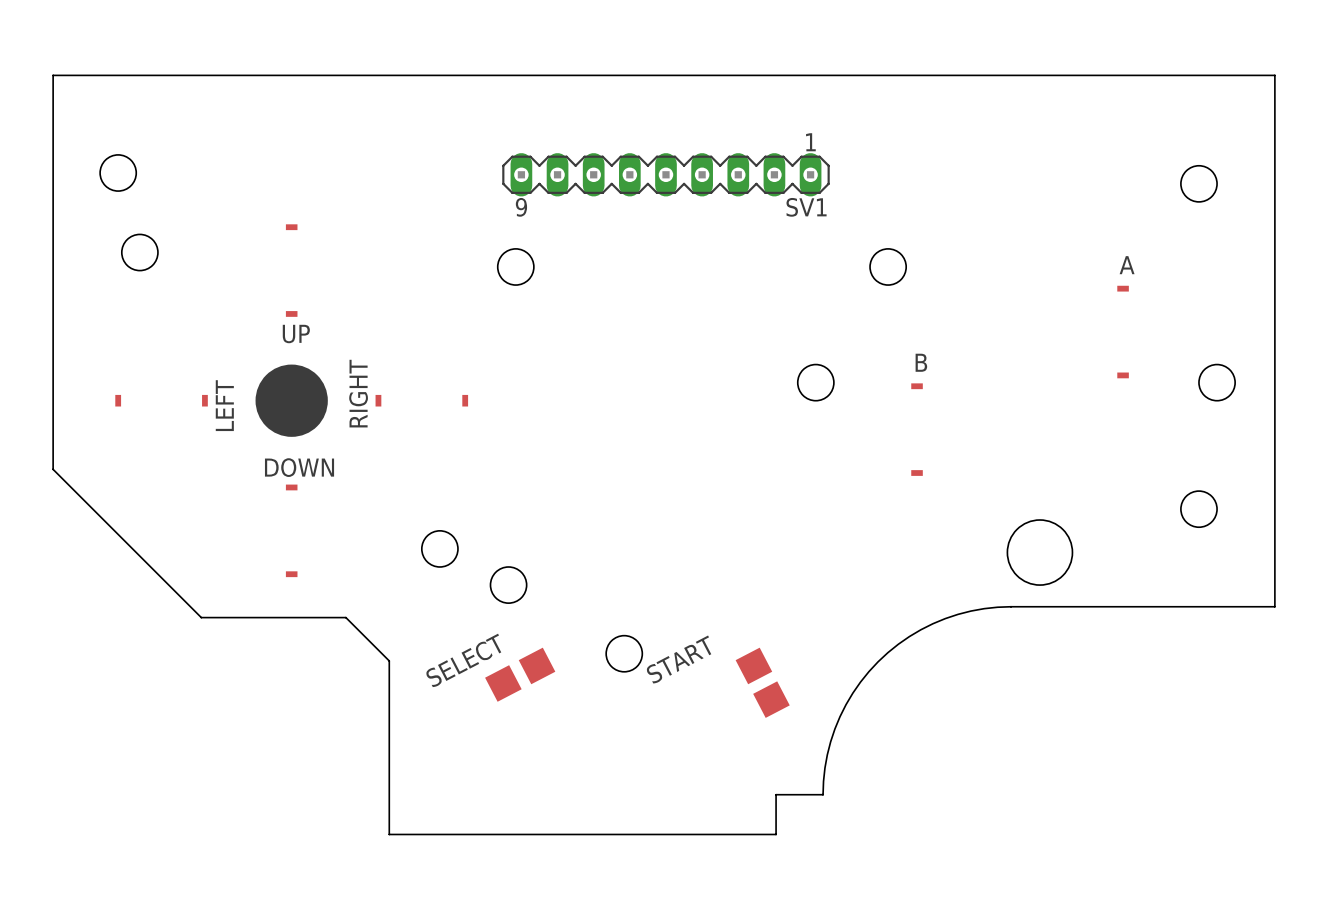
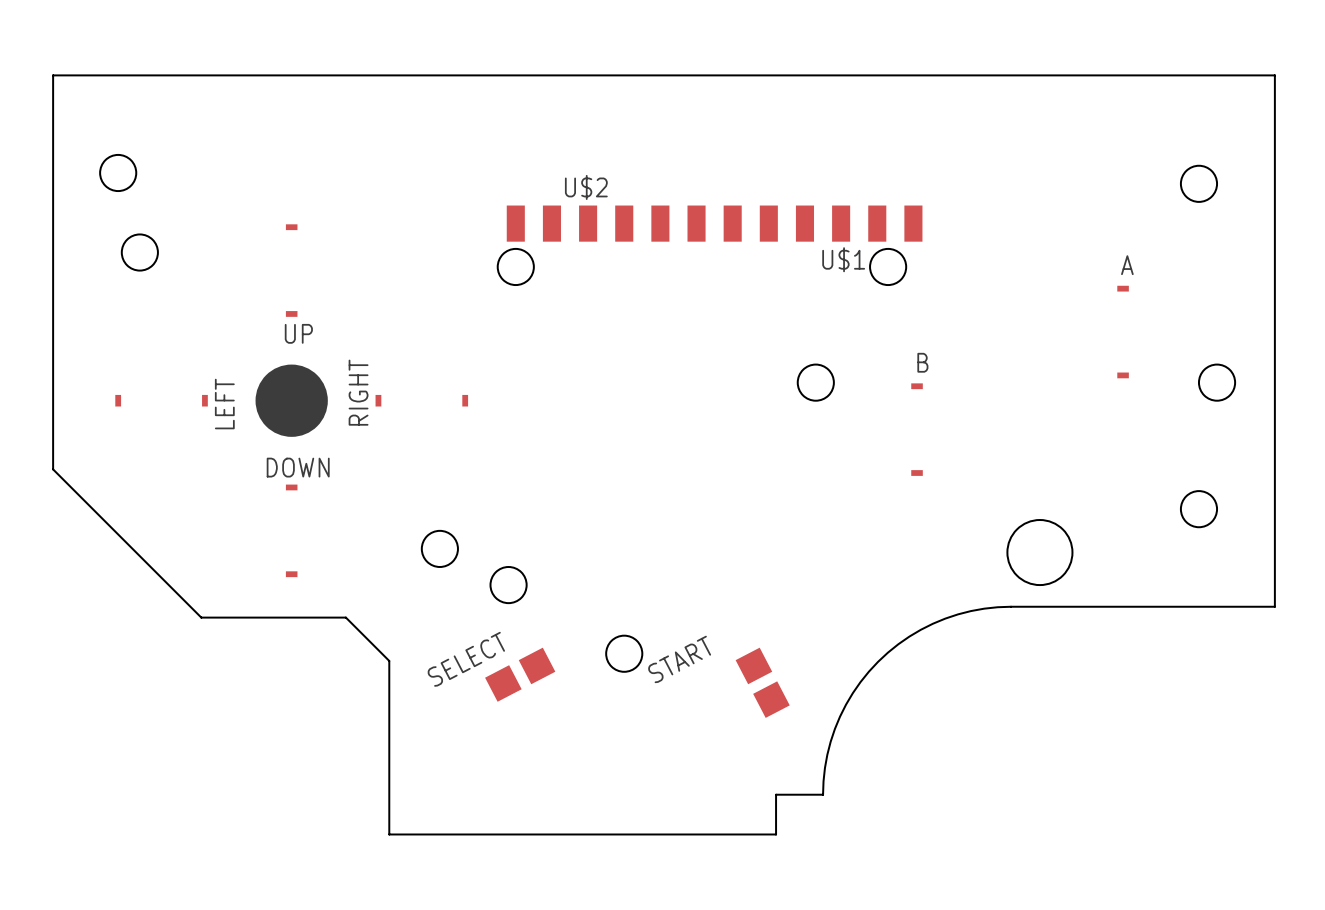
SV1: (665, 174) -> none
U$2: none -> (606, 223)
U$1: none -> (823, 223)

